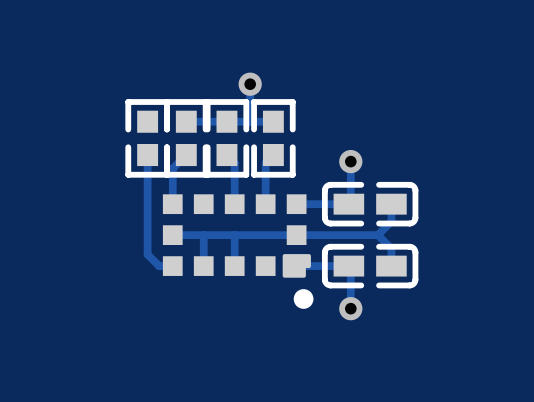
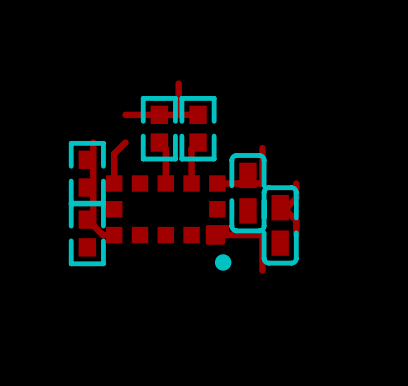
via: (250, 84) -> none
part: (147, 138) -> none
part: (186, 138) -> none
via: (350, 161) -> none
part: none -> (87, 173)
part rotation: 0° (370, 204) -> 90° clockwise (247, 193)
track: (172, 235) (377, 235) -> none
track: (203, 235) (203, 266) -> none
track: (234, 235) (234, 266) -> none
part: none -> (87, 233)
part rotation: 0° (370, 266) -> 90° clockwise (280, 225)
via: (350, 308) -> none

